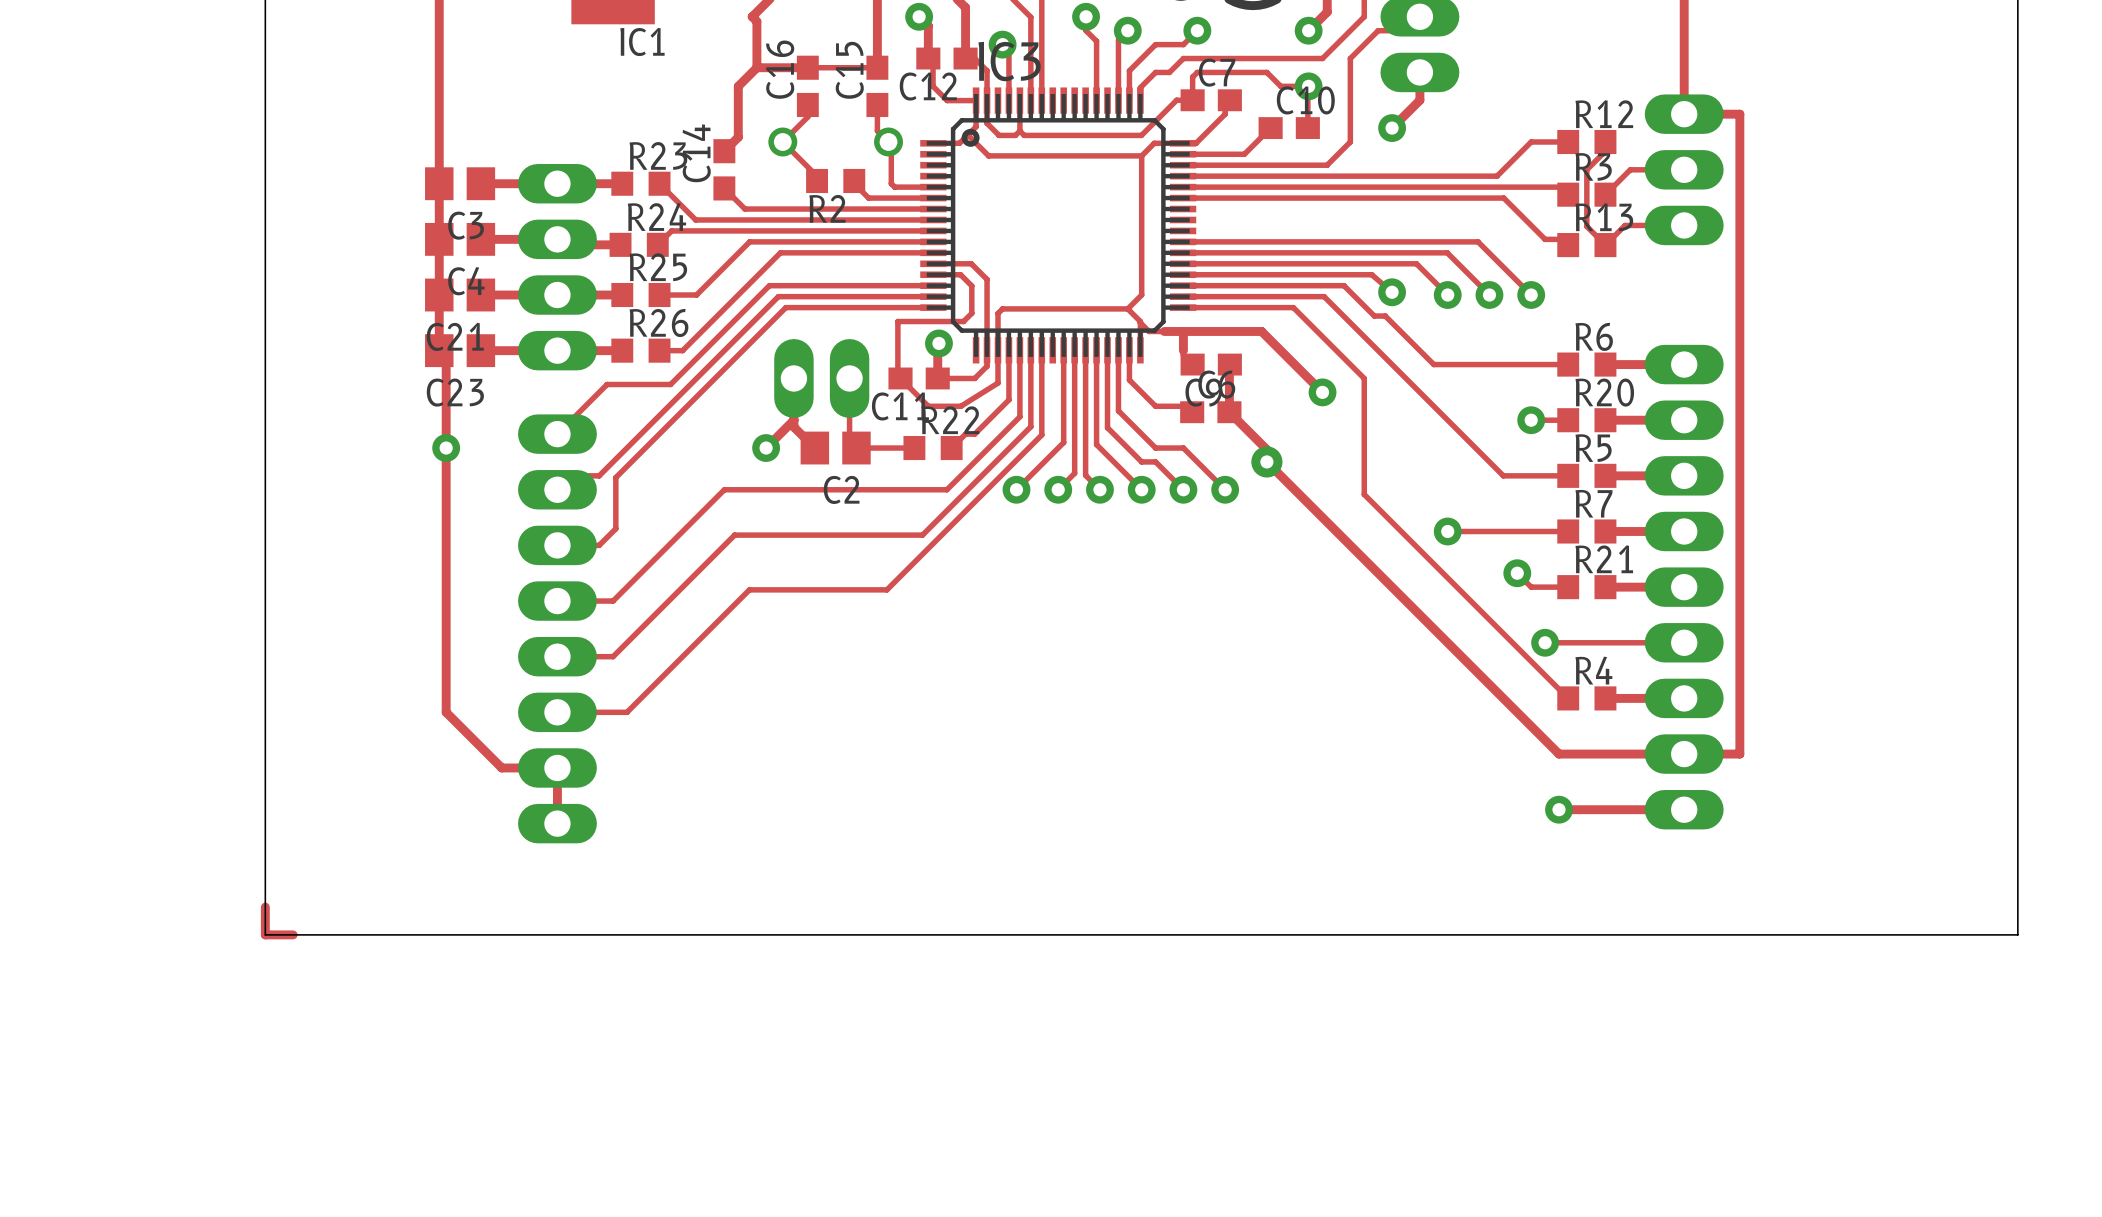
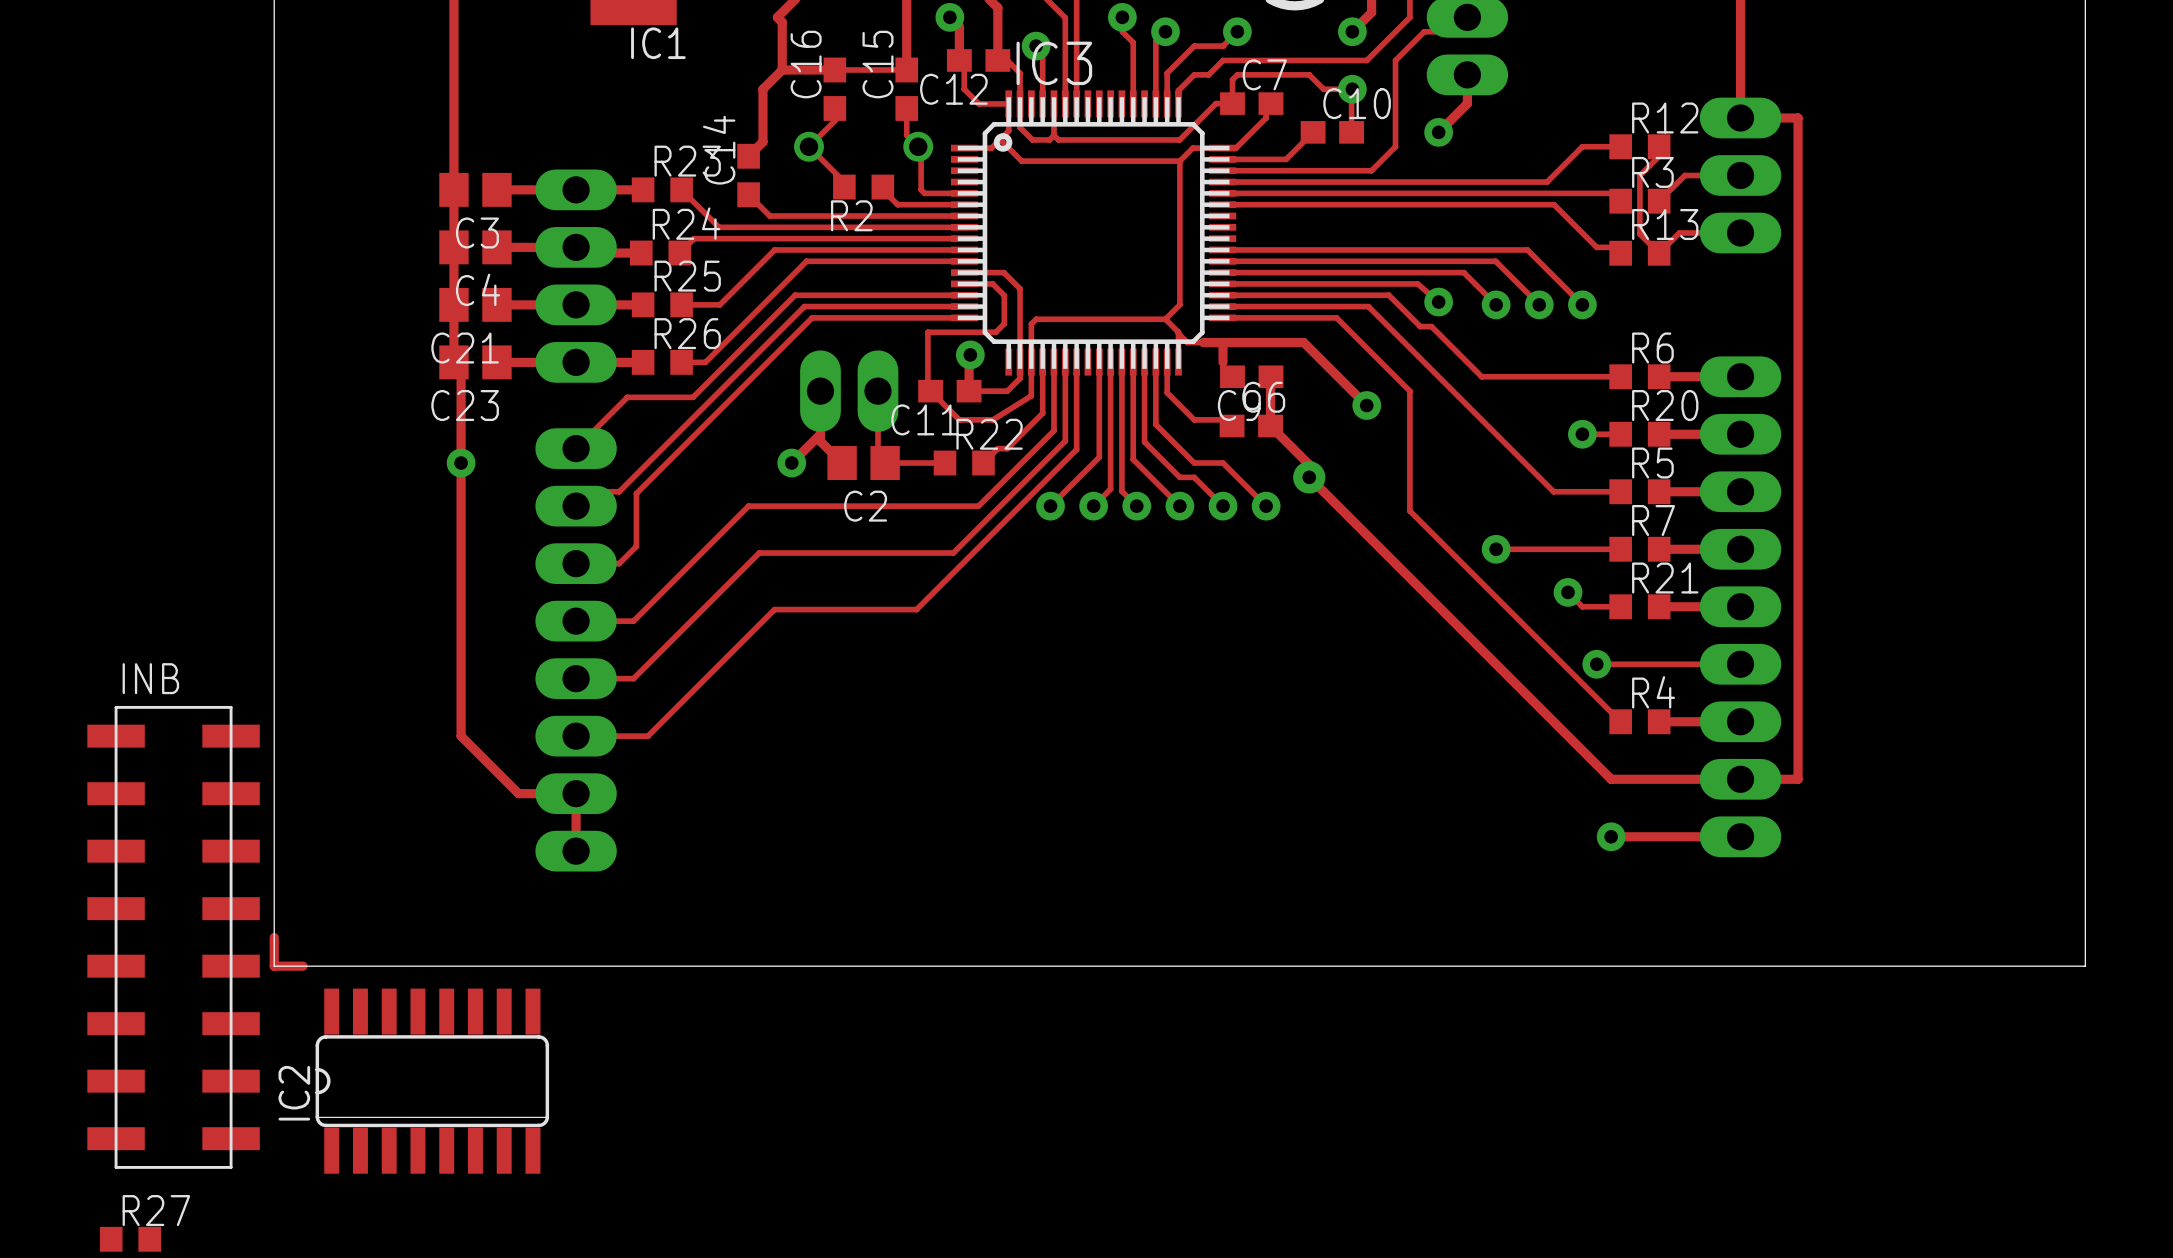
INB: none -> (173, 937)
IC2: none -> (432, 1081)
R27: none -> (130, 1239)

